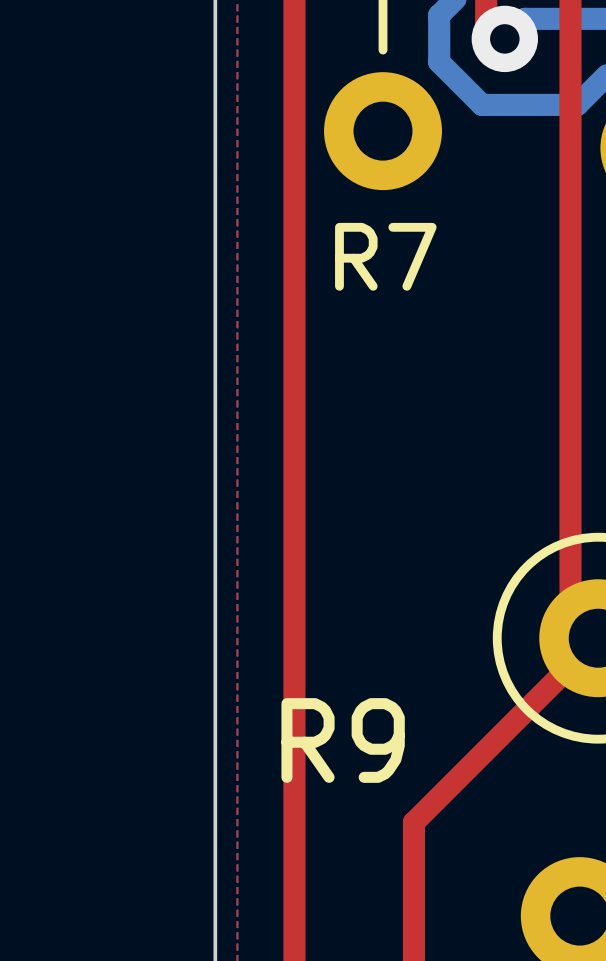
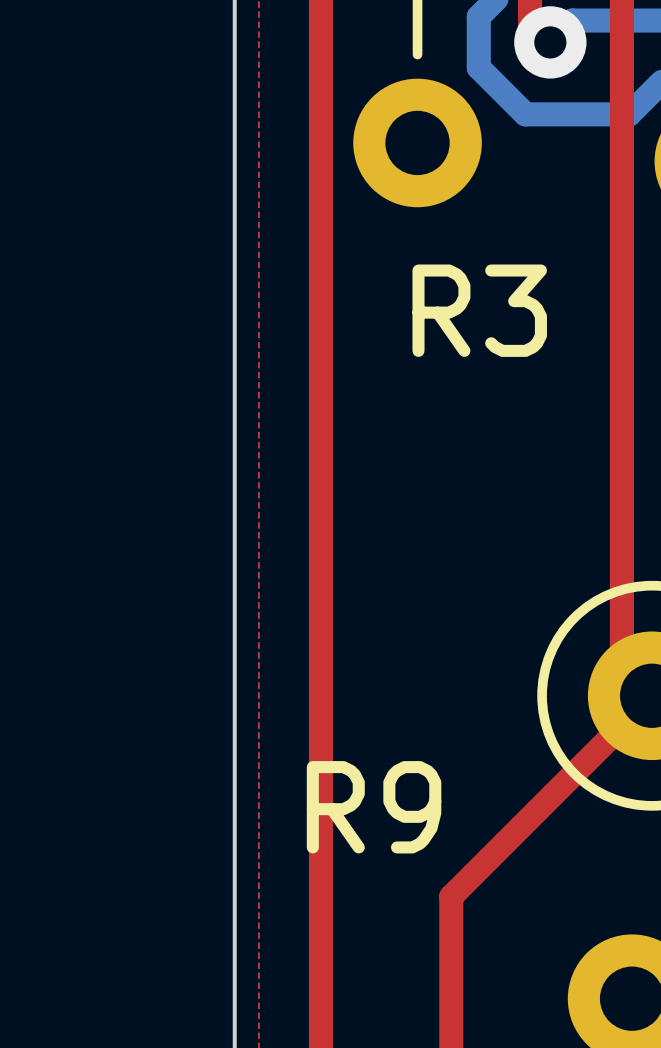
R7 name: R7 (385, 256) -> none
R3 name: none -> R3 (479, 310)

